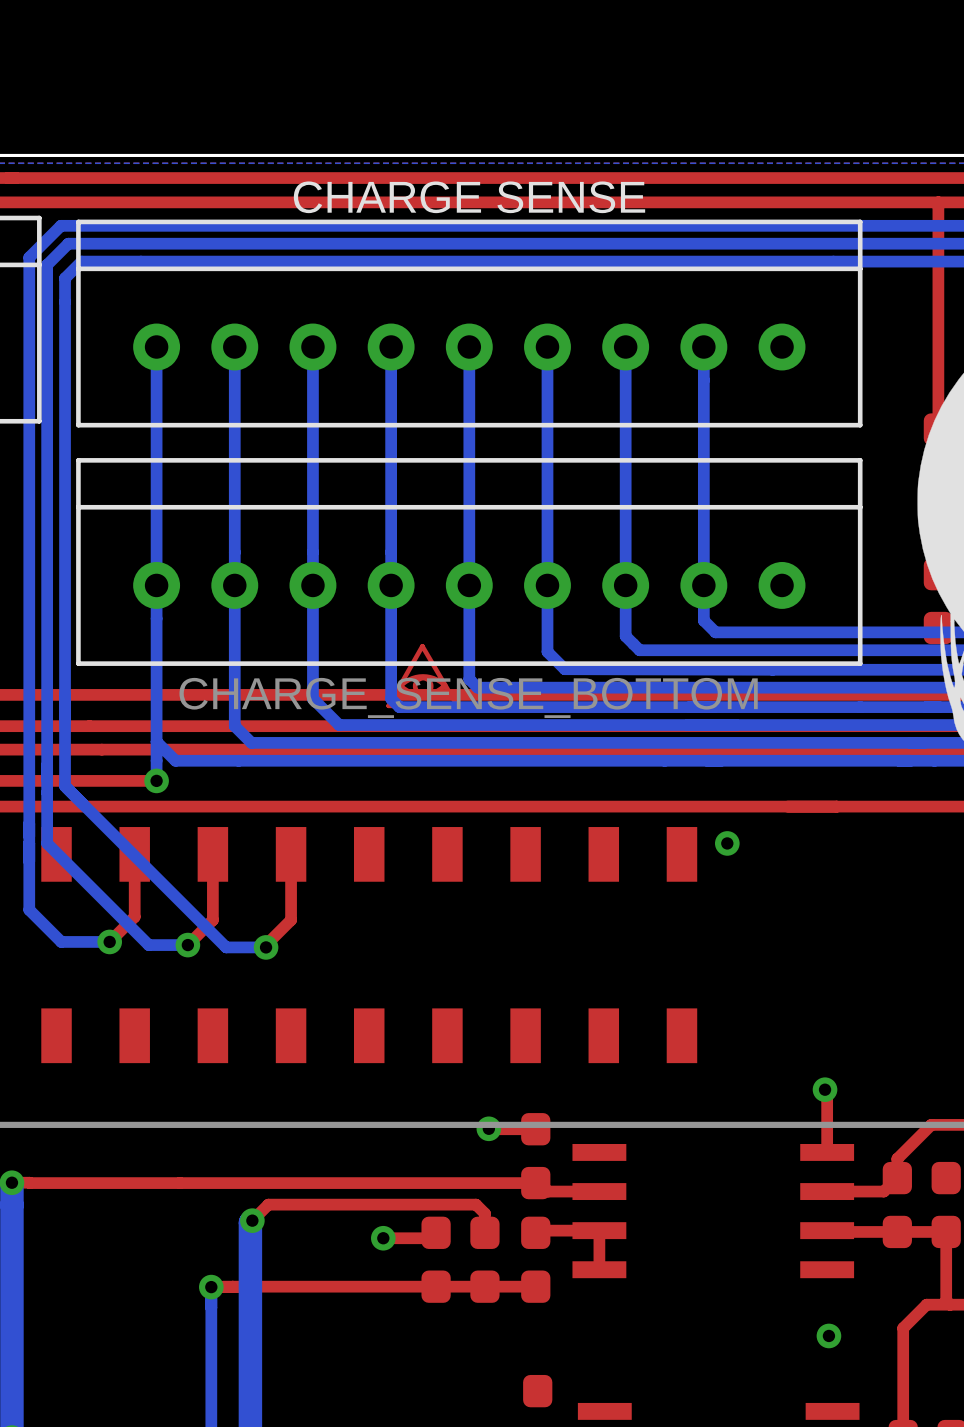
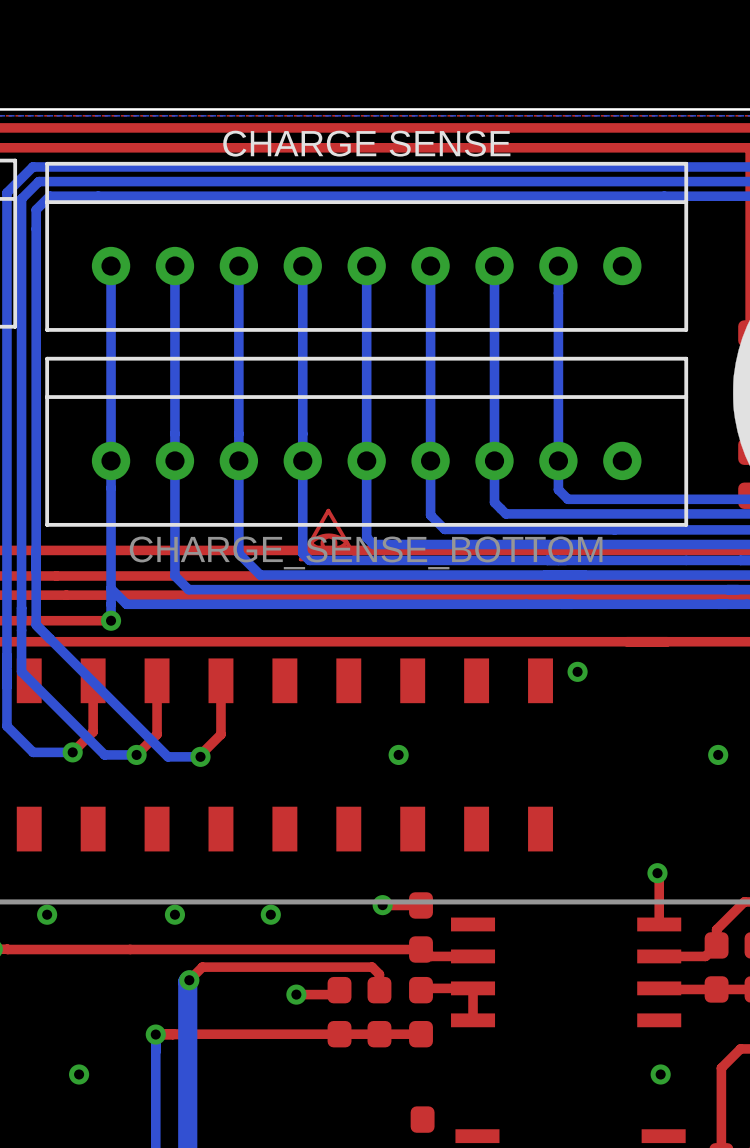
via: none -> (398, 754)
via: none -> (718, 754)
via: none -> (47, 914)
via: none -> (174, 914)
via: none -> (270, 914)
via: none -> (79, 1074)

